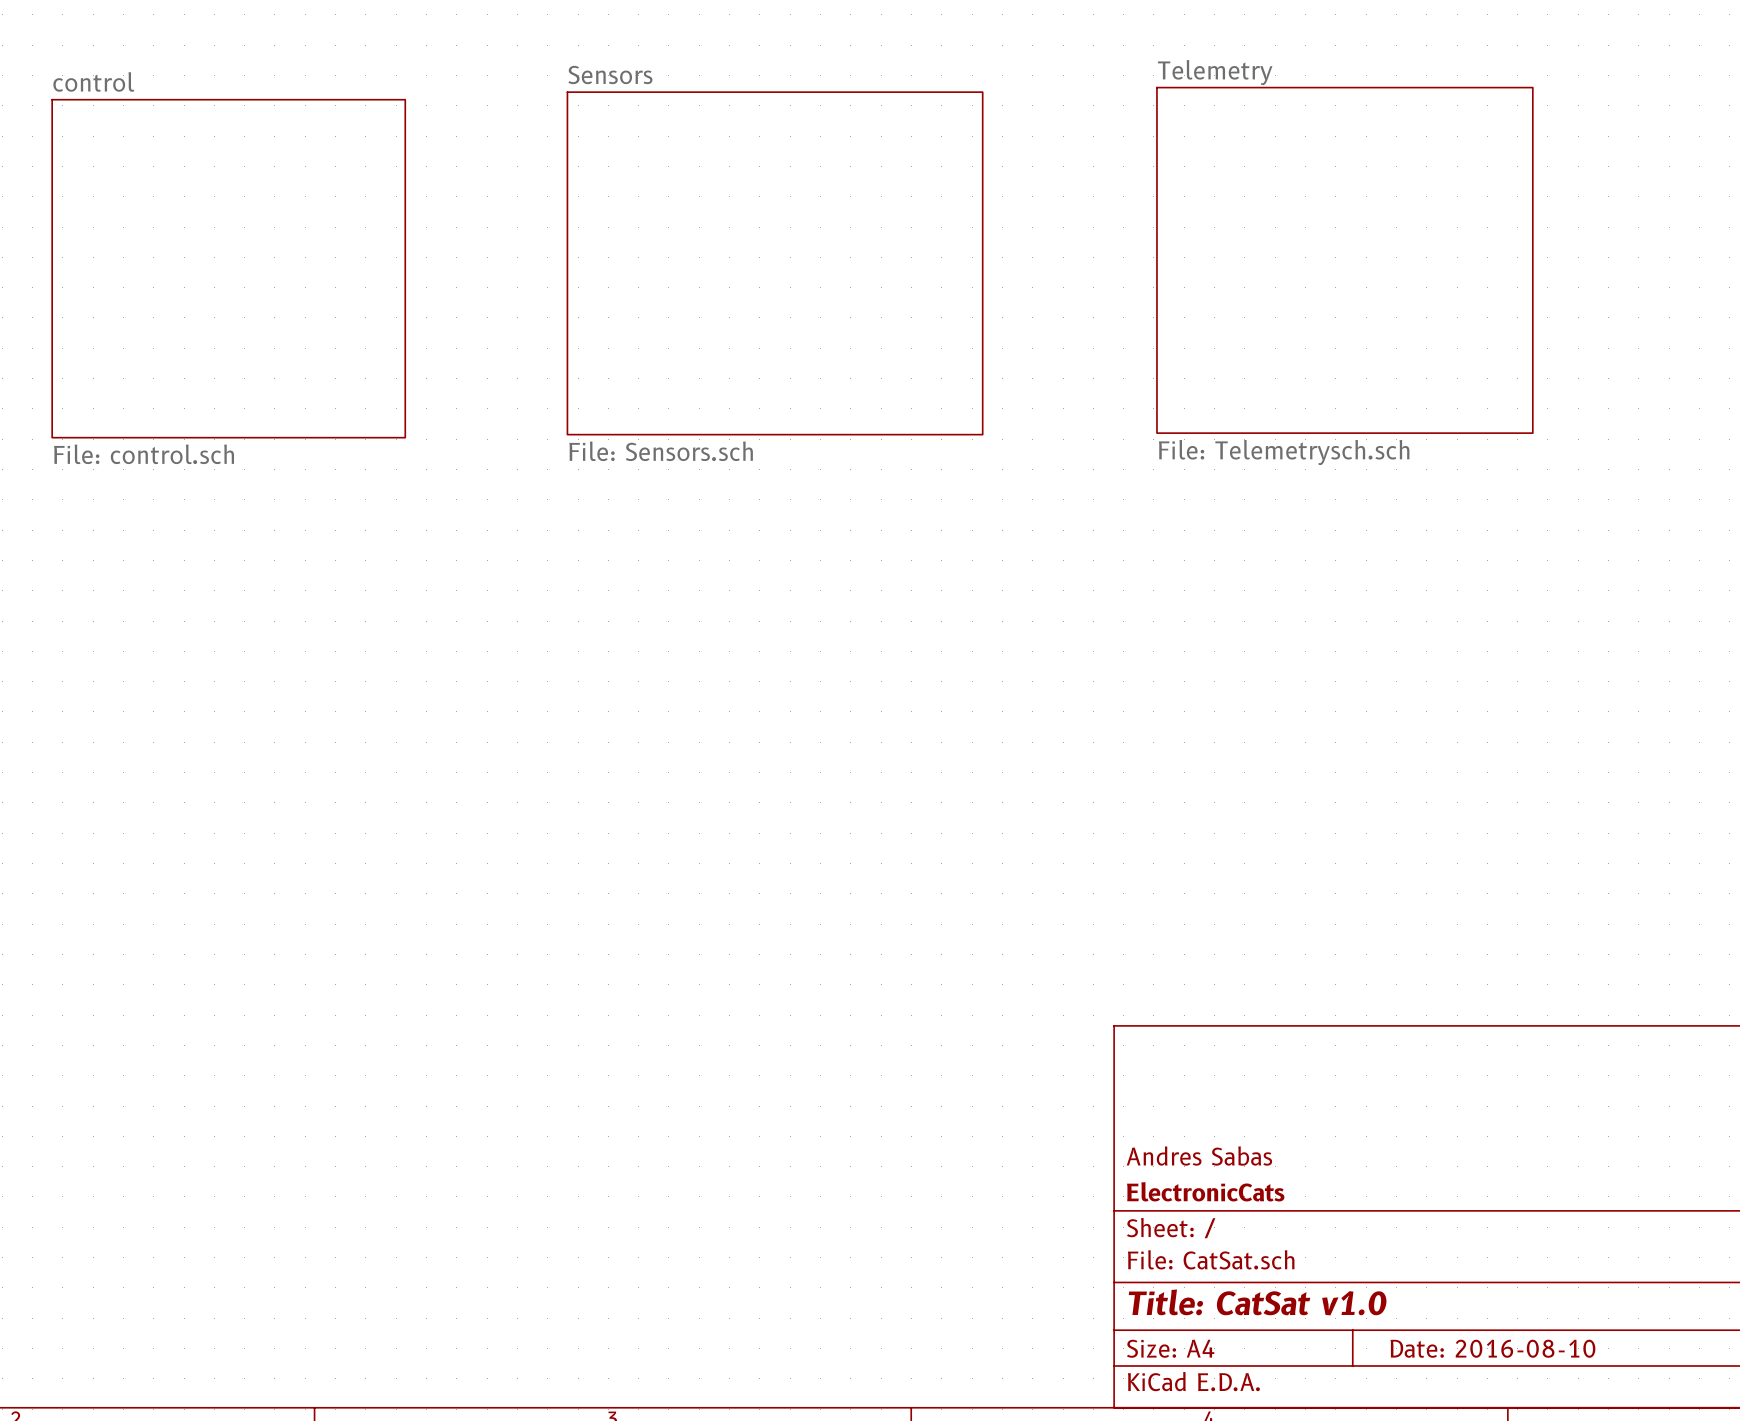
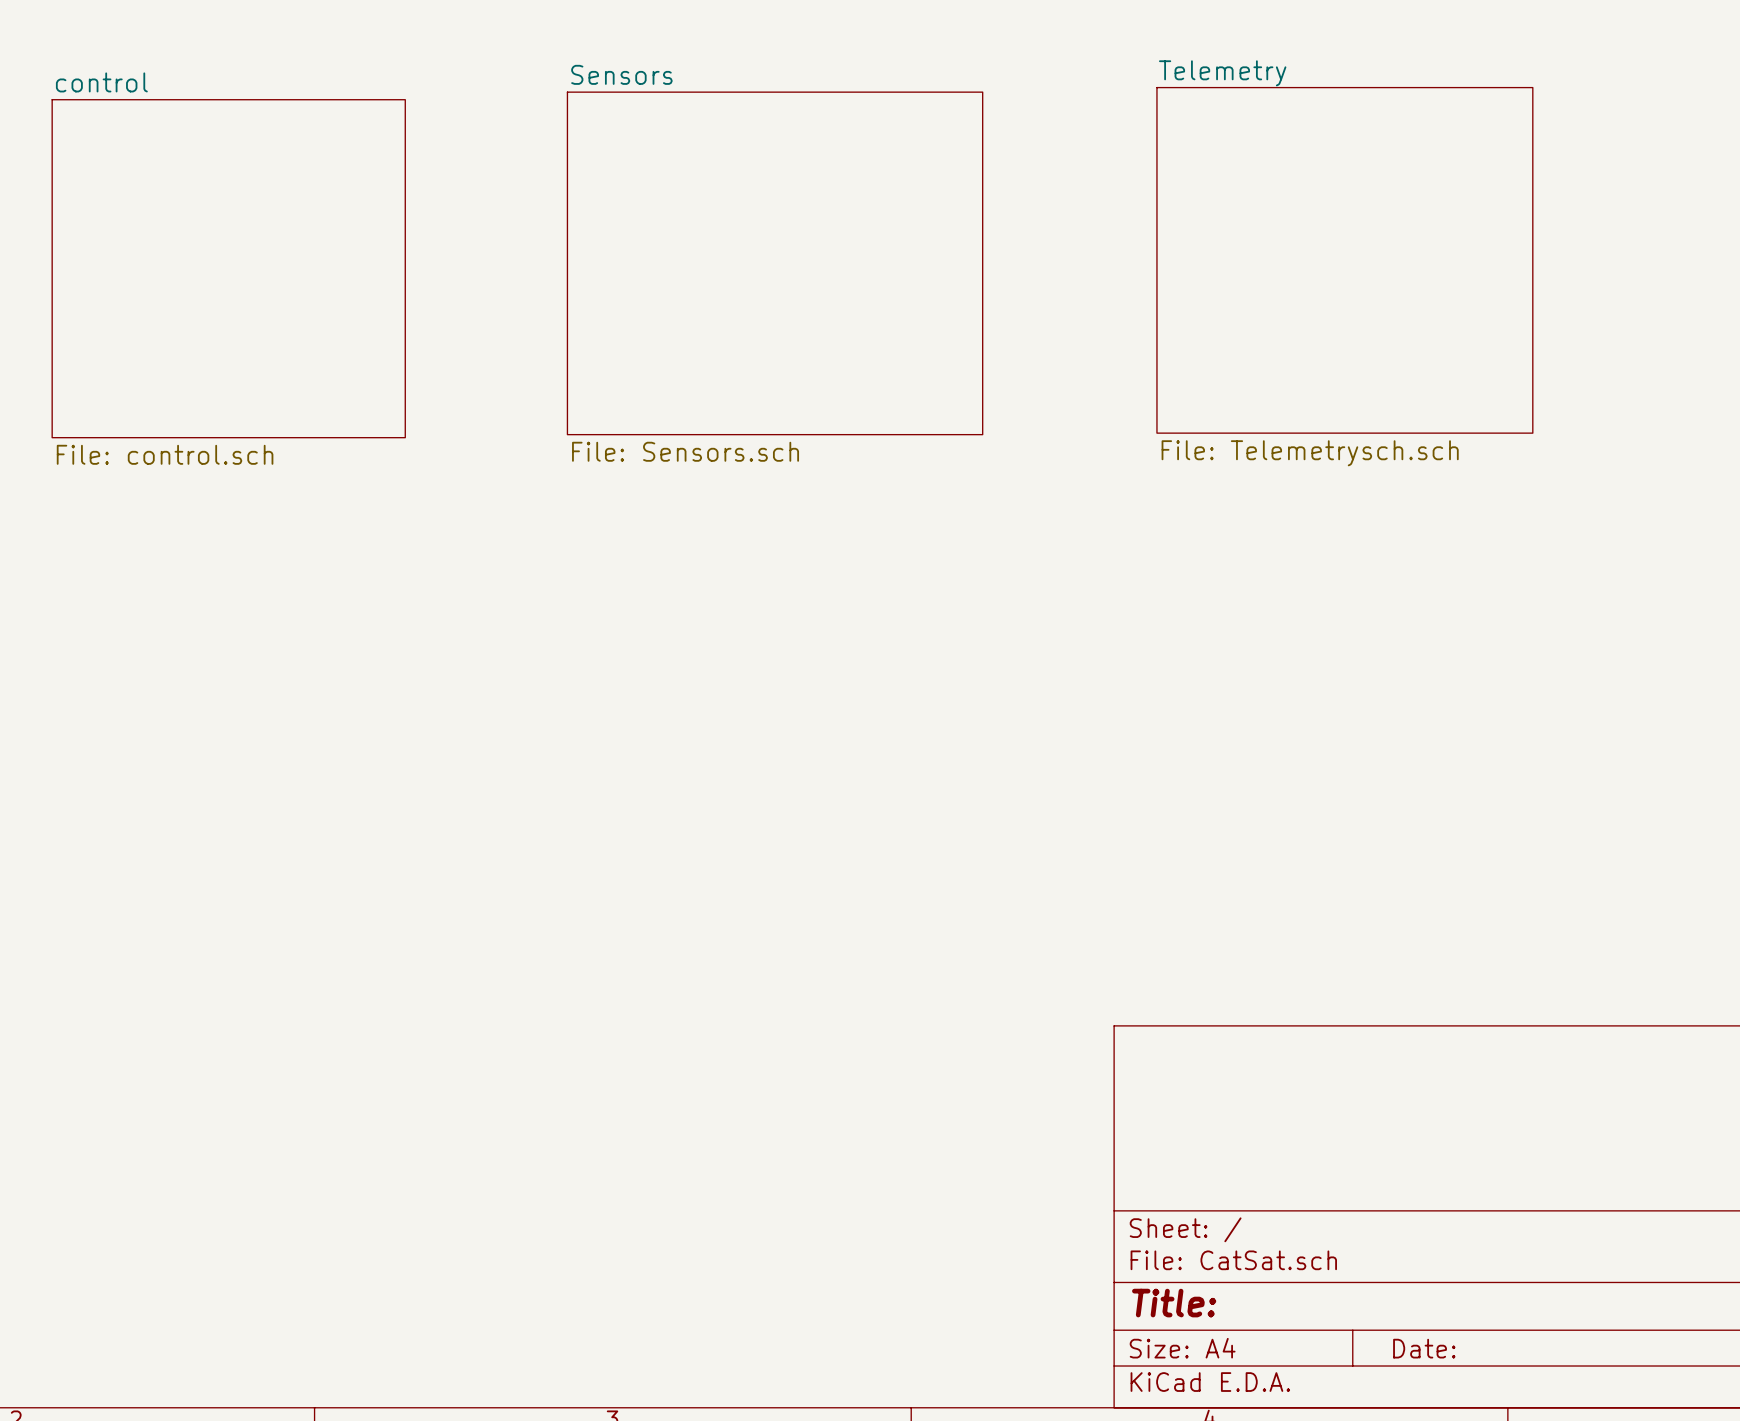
title block: Andres Sabas (1199, 1156) -> none
title block: ElectronicCats (1205, 1191) -> none
title block: Title: CatSat v1.0 (1257, 1302) -> Title: (1174, 1303)
title block: Date: 2016-08-10 (1492, 1348) -> Date: (1424, 1348)

